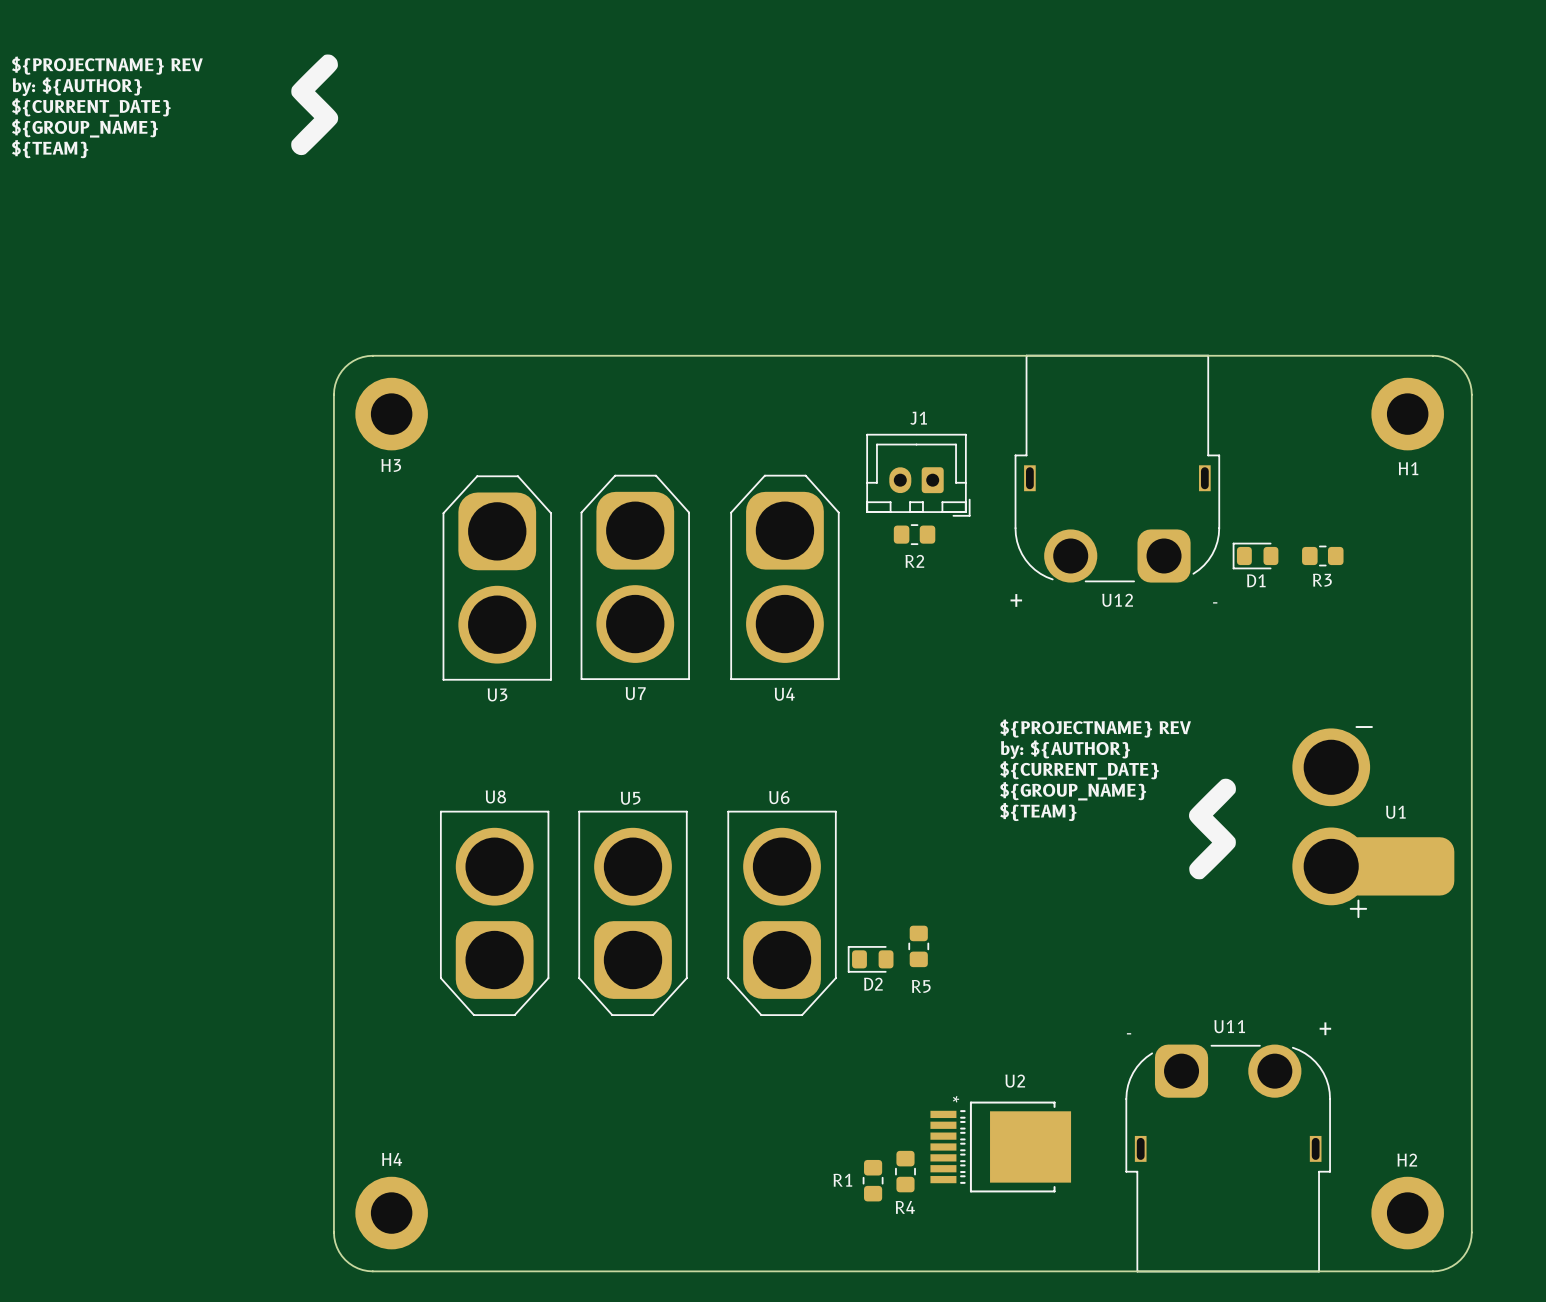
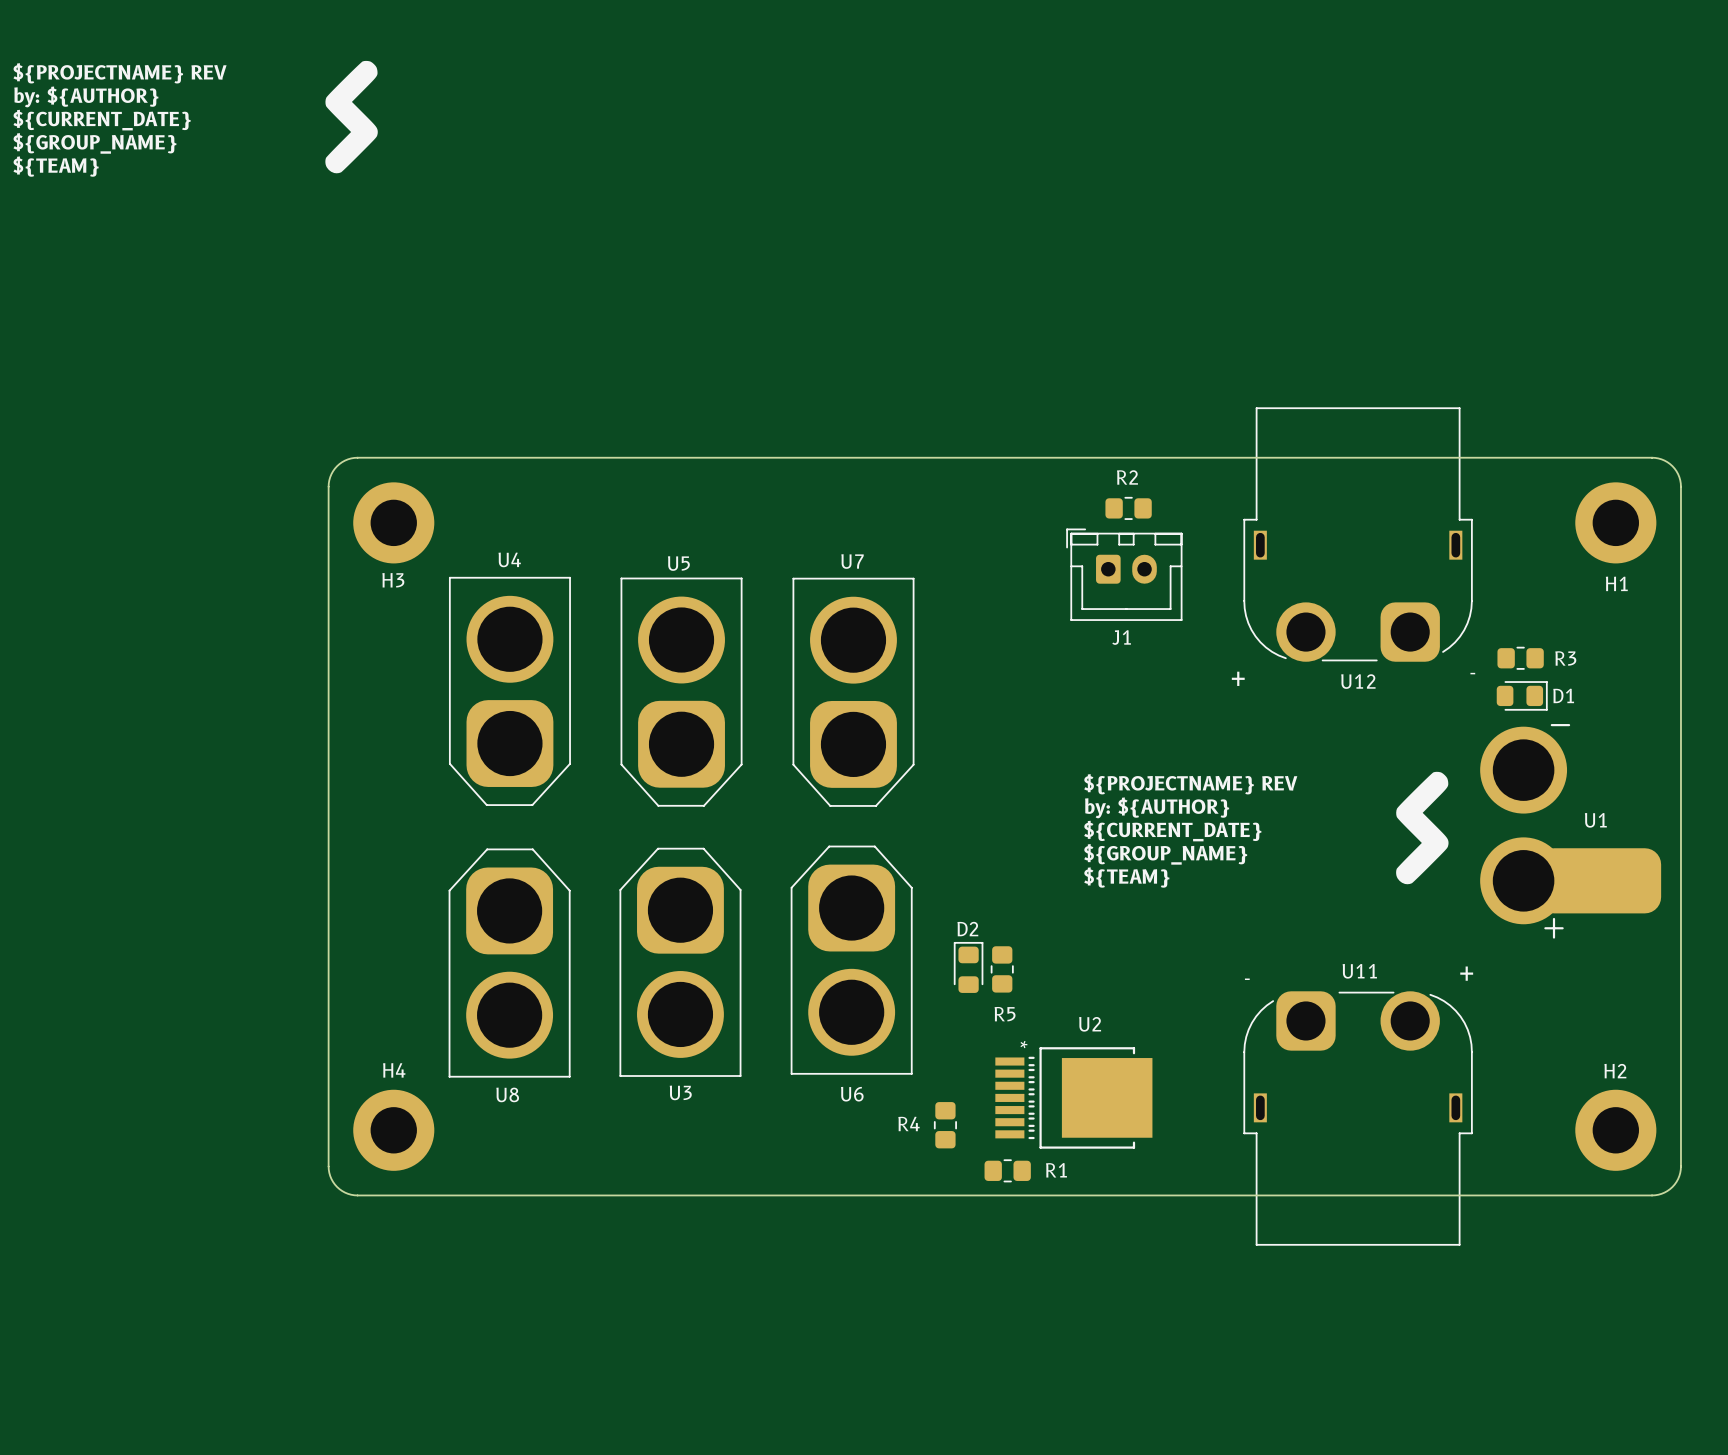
board edge: (372, 355) (1432, 355) (1443, 357) (1456, 363) (1468, 379) (1471, 394) (1471, 1232) (1470, 1242) (1463, 1256) (1452, 1266) (1432, 1271) (372, 1271) (362, 1270) (349, 1263) (339, 1251) (333, 1232) (333, 394) (336, 379) (345, 367) (357, 358) (372, 355) -> (357, 457) (345, 460) (337, 466) (331, 474) (328, 486) (328, 1166) (333, 1181) (345, 1192) (357, 1195) (1652, 1195) (1667, 1191) (1678, 1179) (1680, 1166) (1680, 486) (1676, 471) (1664, 460) (1652, 457) (357, 457)
H3 position: (391, 414) -> (393, 522)
H1 position: (1407, 414) -> (1615, 522)
U12 position: (1117, 468) -> (1358, 534)
J1 rotation: 0° (918, 475) -> 180° (1124, 574)
J1 position: (918, 475) -> (1124, 574)
R2 position: (914, 534) -> (1128, 508)
D1 rotation: 0° (1255, 555) -> 180° (1522, 695)
D1 position: (1255, 555) -> (1522, 695)
R3 position: (1322, 555) -> (1520, 658)
R2 name position: R2 (914, 561) -> R2 (1127, 477)
U7 rotation: 0° (635, 577) -> 180° (853, 692)
U7 position: (635, 577) -> (853, 692)
U4 rotation: 0° (784, 577) -> 180° (509, 691)
U4 position: (784, 577) -> (509, 691)
U3 position: (497, 578) -> (680, 962)
D1 name position: D1 (1256, 580) -> D1 (1563, 695)
R3 name position: R3 (1322, 580) -> R3 (1565, 658)
U12 text position: + (1016, 600) -> + (1238, 678)
U12 text position: - (1215, 602) -> - (1472, 673)
drawing: none -> [1396, 771, 1449, 885]
text position: ${PROJECTNAME} REV (1095, 728) -> ${PROJECTNAME} REV (1190, 784)
text position: by: ${AUTHOR} (1065, 749) -> by: ${AUTHOR} (1157, 807)
text position: ${CURRENT_DATE} (1079, 770) -> ${CURRENT_DATE} (1172, 831)
drawing: [1189, 778, 1236, 880] -> none
text position: ${GROUP_NAME} (1073, 791) -> ${GROUP_NAME} (1165, 854)
text position: ${TEAM} (1038, 811) -> ${TEAM} (1126, 877)
U1 position: (1373, 822) -> (1570, 831)
U8 rotation: 0° (494, 913) -> 180° (509, 963)
U5 position: (633, 913) -> (681, 692)
U6 rotation: 0° (782, 913) -> 180° (851, 960)
R5 position: (918, 946) -> (1002, 969)
D2 rotation: 0° (870, 959) -> 90° clockwise (968, 967)
D2 position: (870, 959) -> (968, 967)
D2 name position: D2 (873, 984) -> D2 (967, 929)
U2 position: (1000, 1147) -> (1073, 1097)
U11 position: (1228, 1158) -> (1358, 1118)
R4 position: (905, 1171) -> (945, 1125)
R1 name position: R1 (842, 1180) -> R1 (1056, 1170)
R1 rotation: 0° (873, 1180) -> 90° clockwise (1007, 1170)
R1 position: (873, 1180) -> (1007, 1170)
R4 name position: R4 (905, 1207) -> R4 (909, 1123)
H4 position: (391, 1213) -> (393, 1130)
H2 position: (1407, 1213) -> (1615, 1130)

